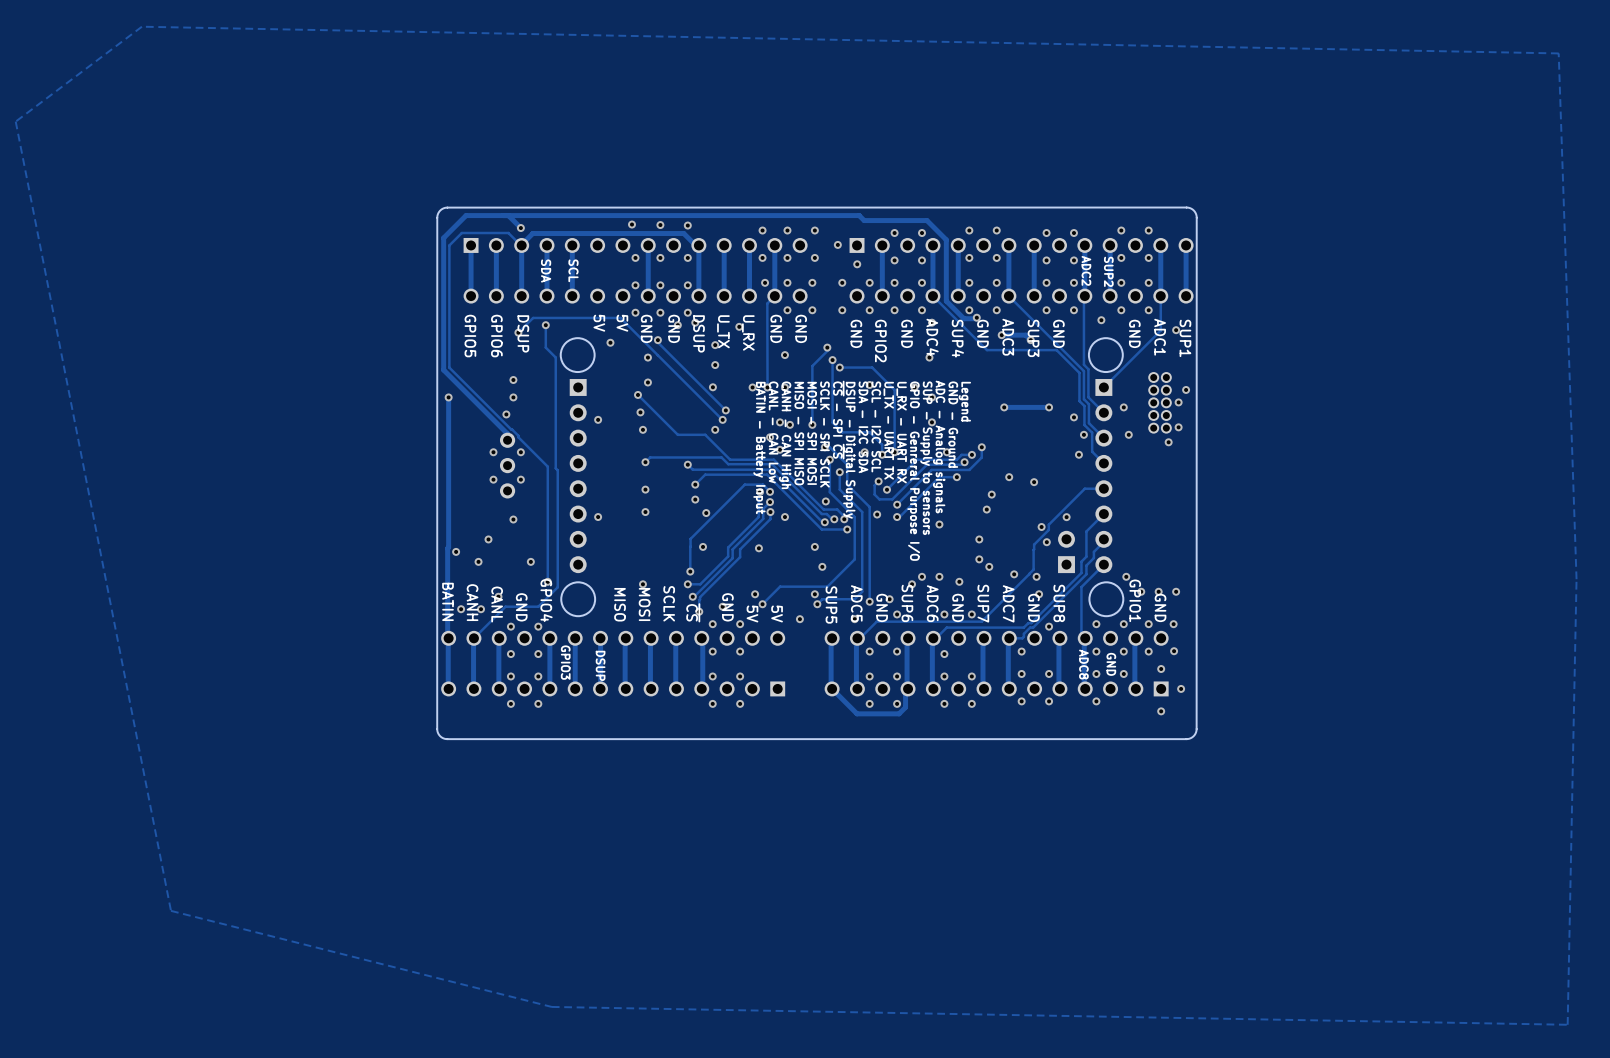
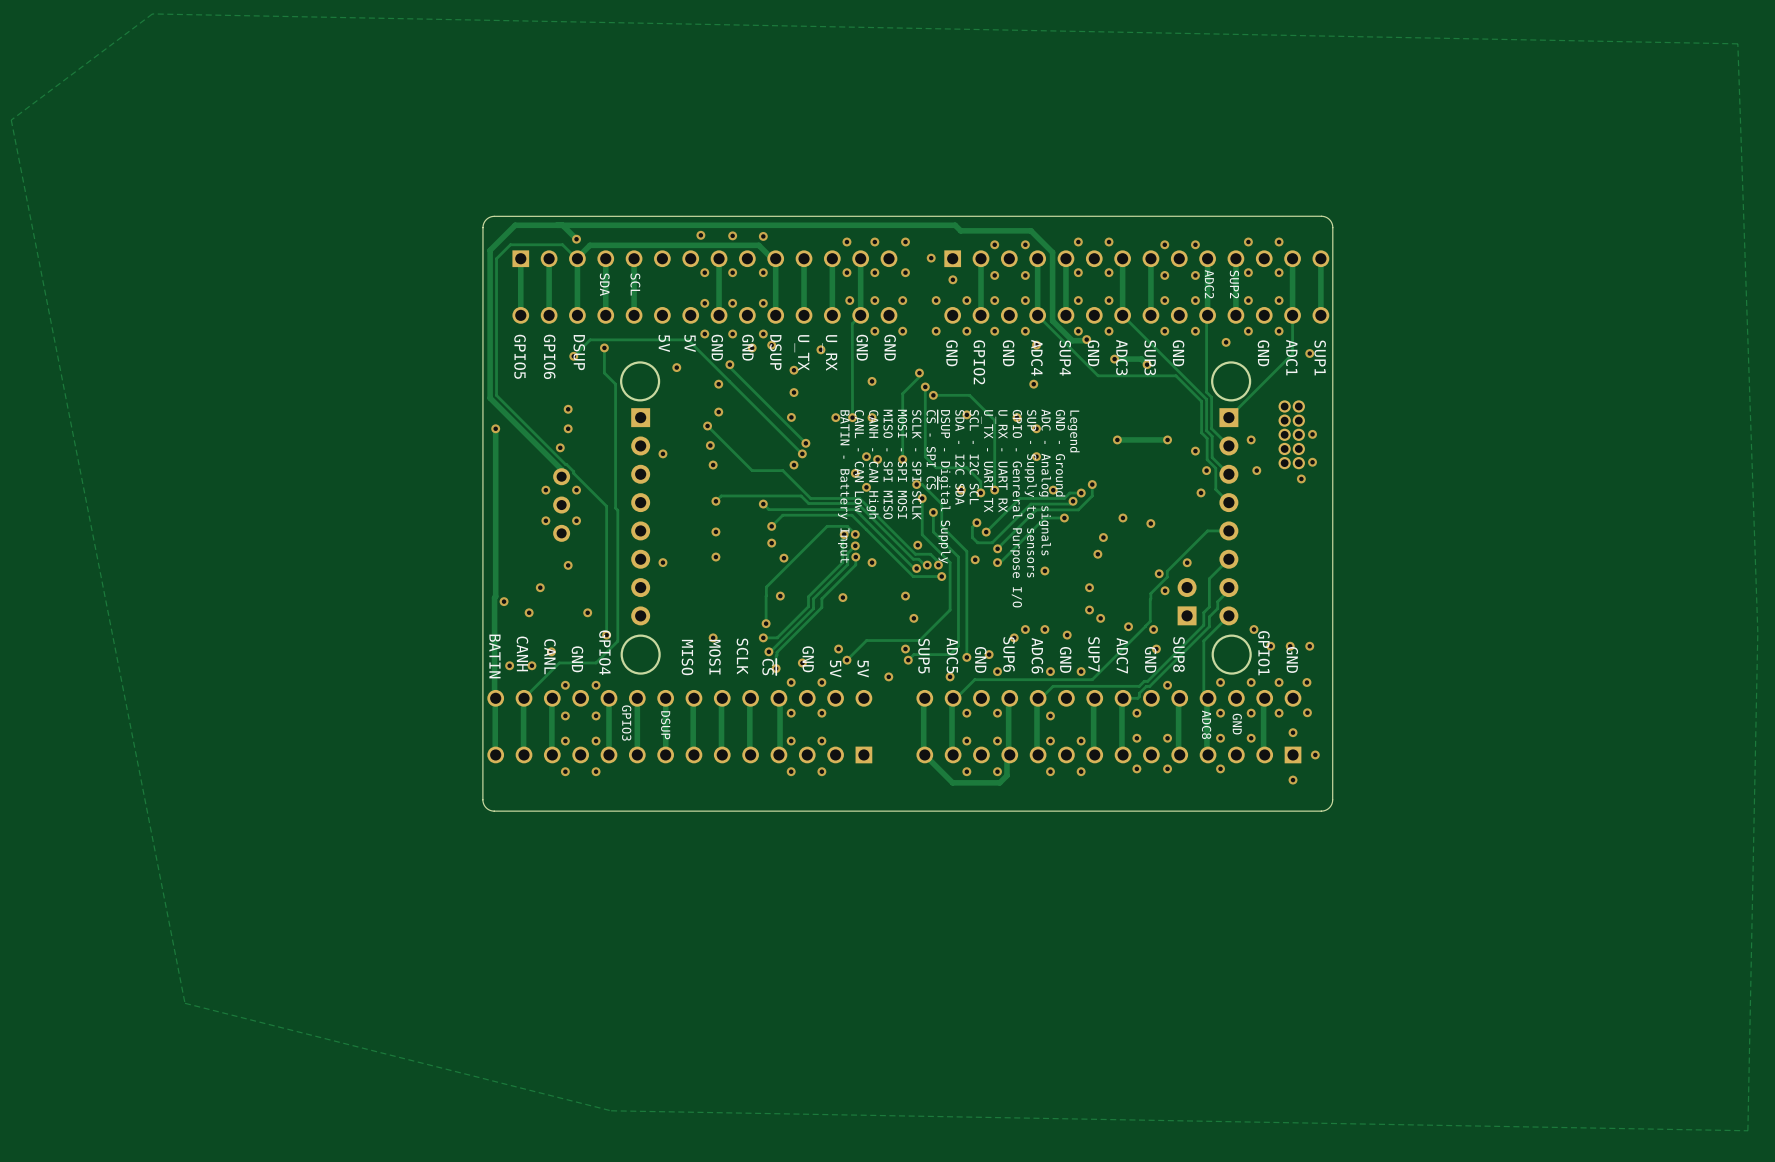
via: (1186, 389) -> none

